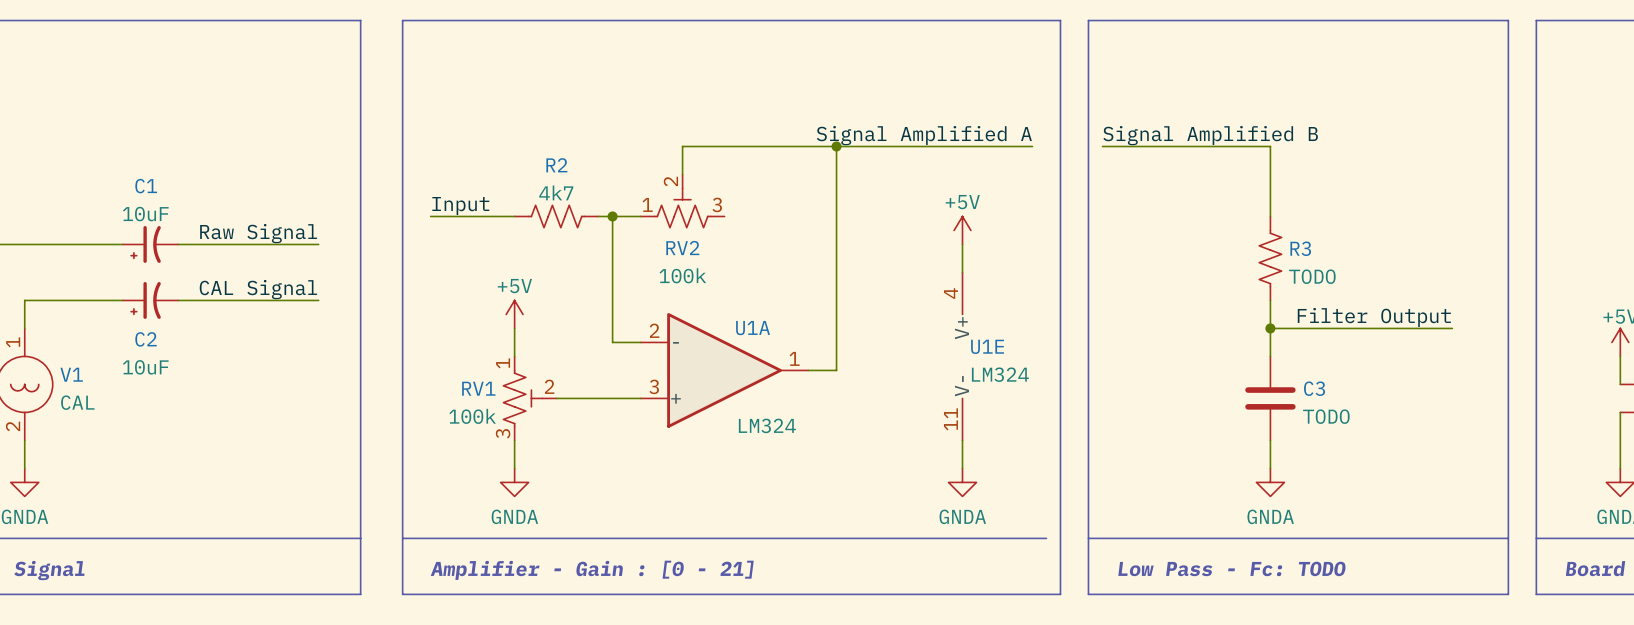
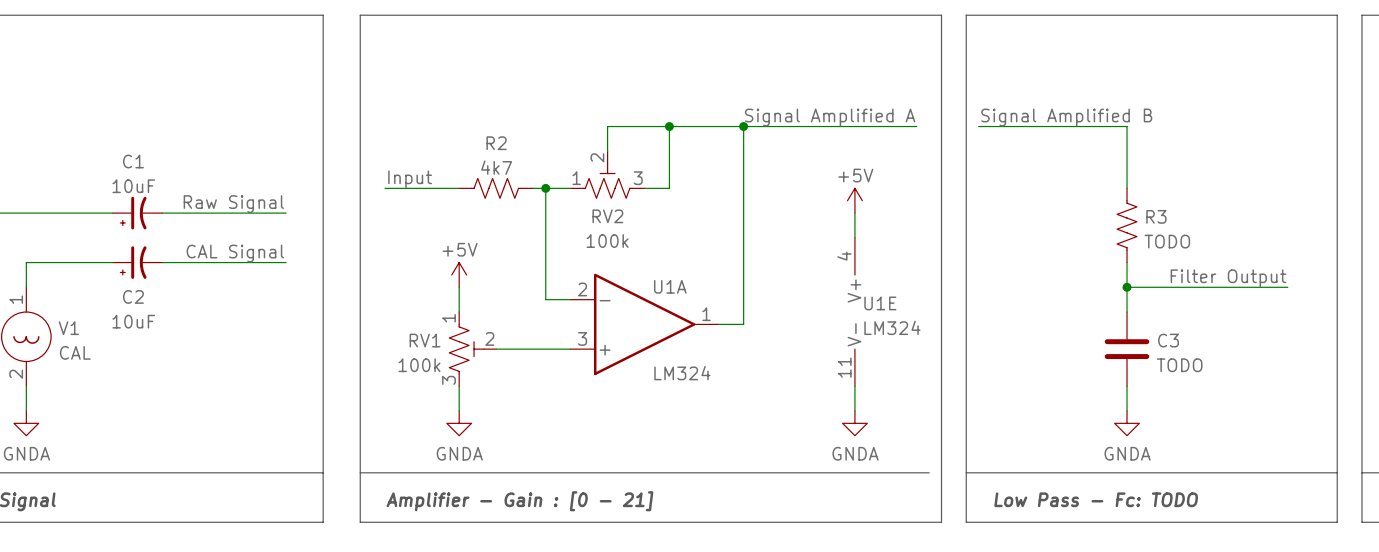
wire: none -> (669, 126) (669, 188) (644, 188)
junction: none -> (669, 126)

